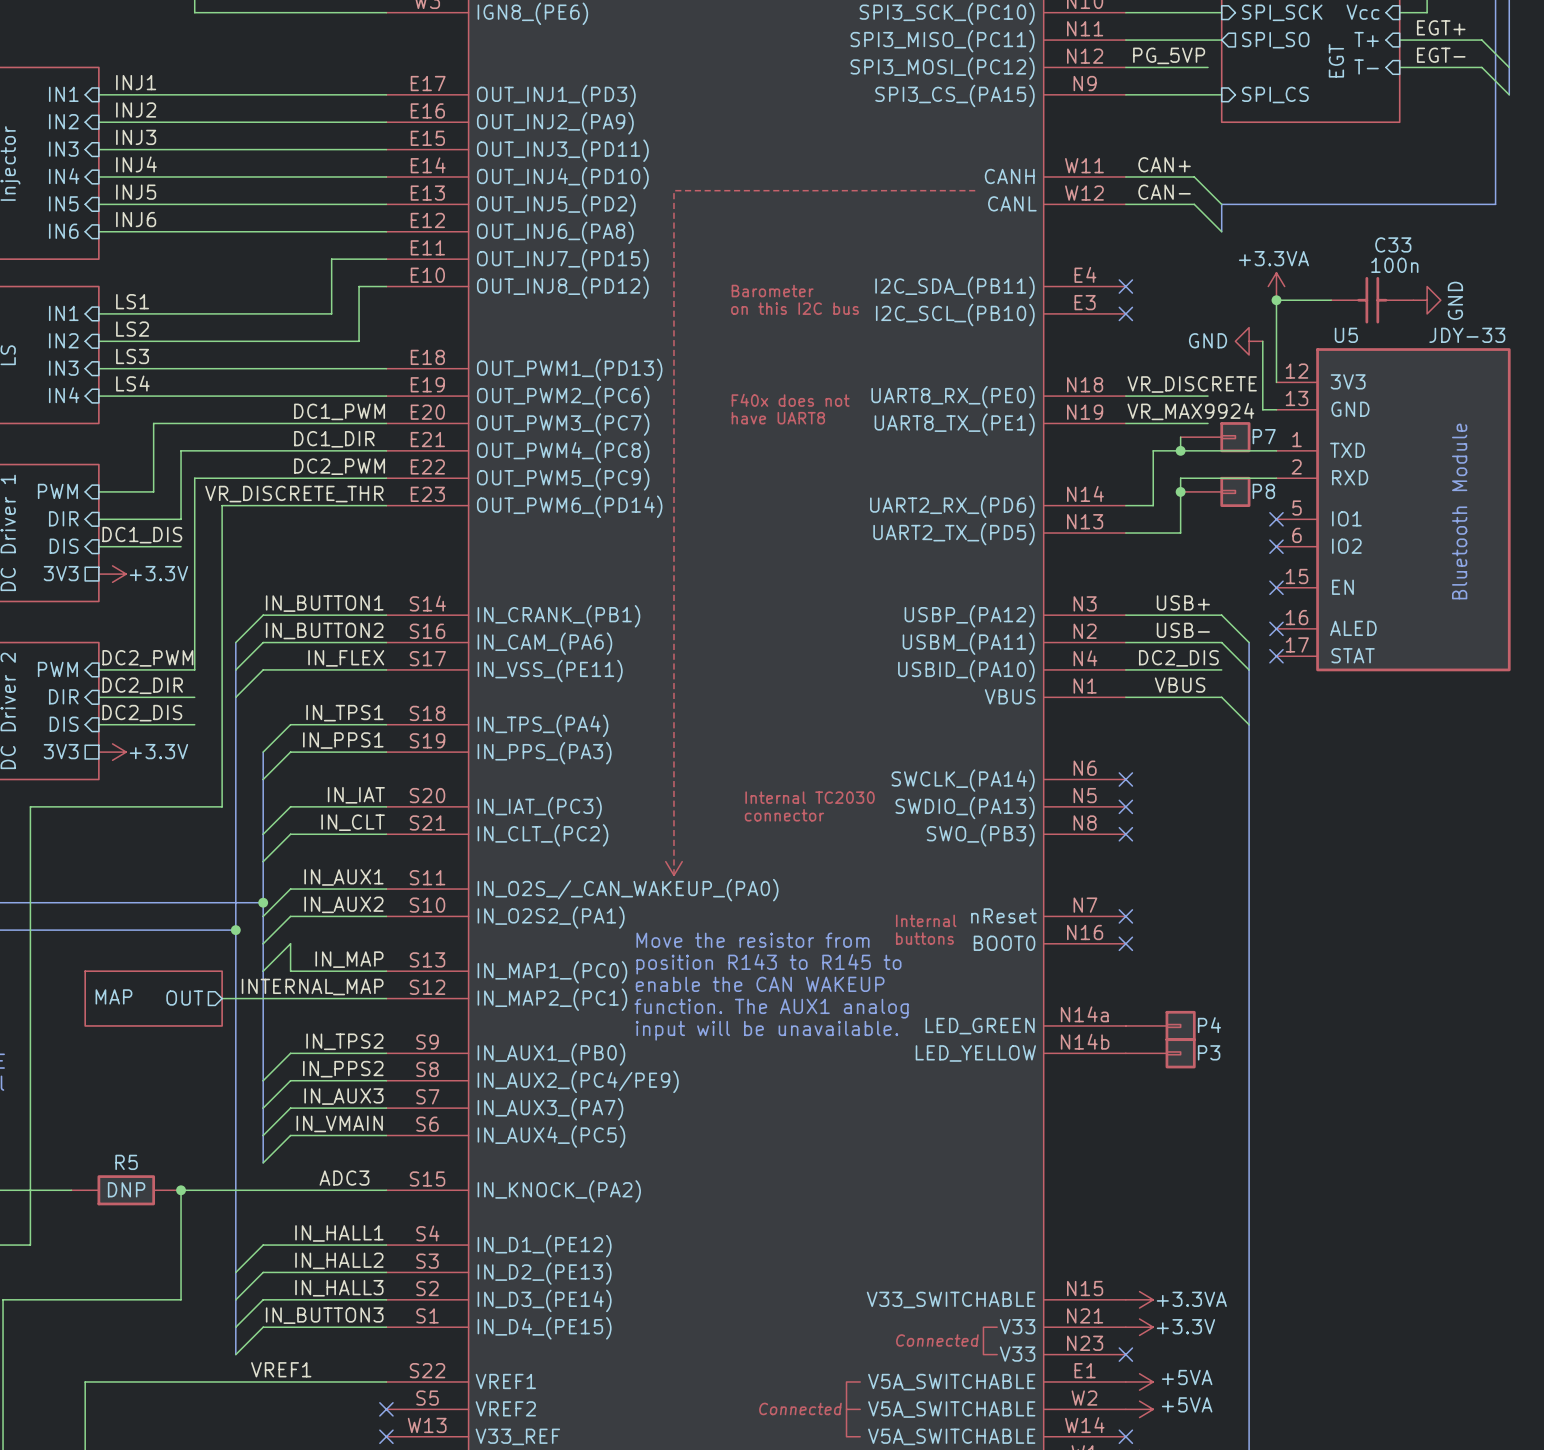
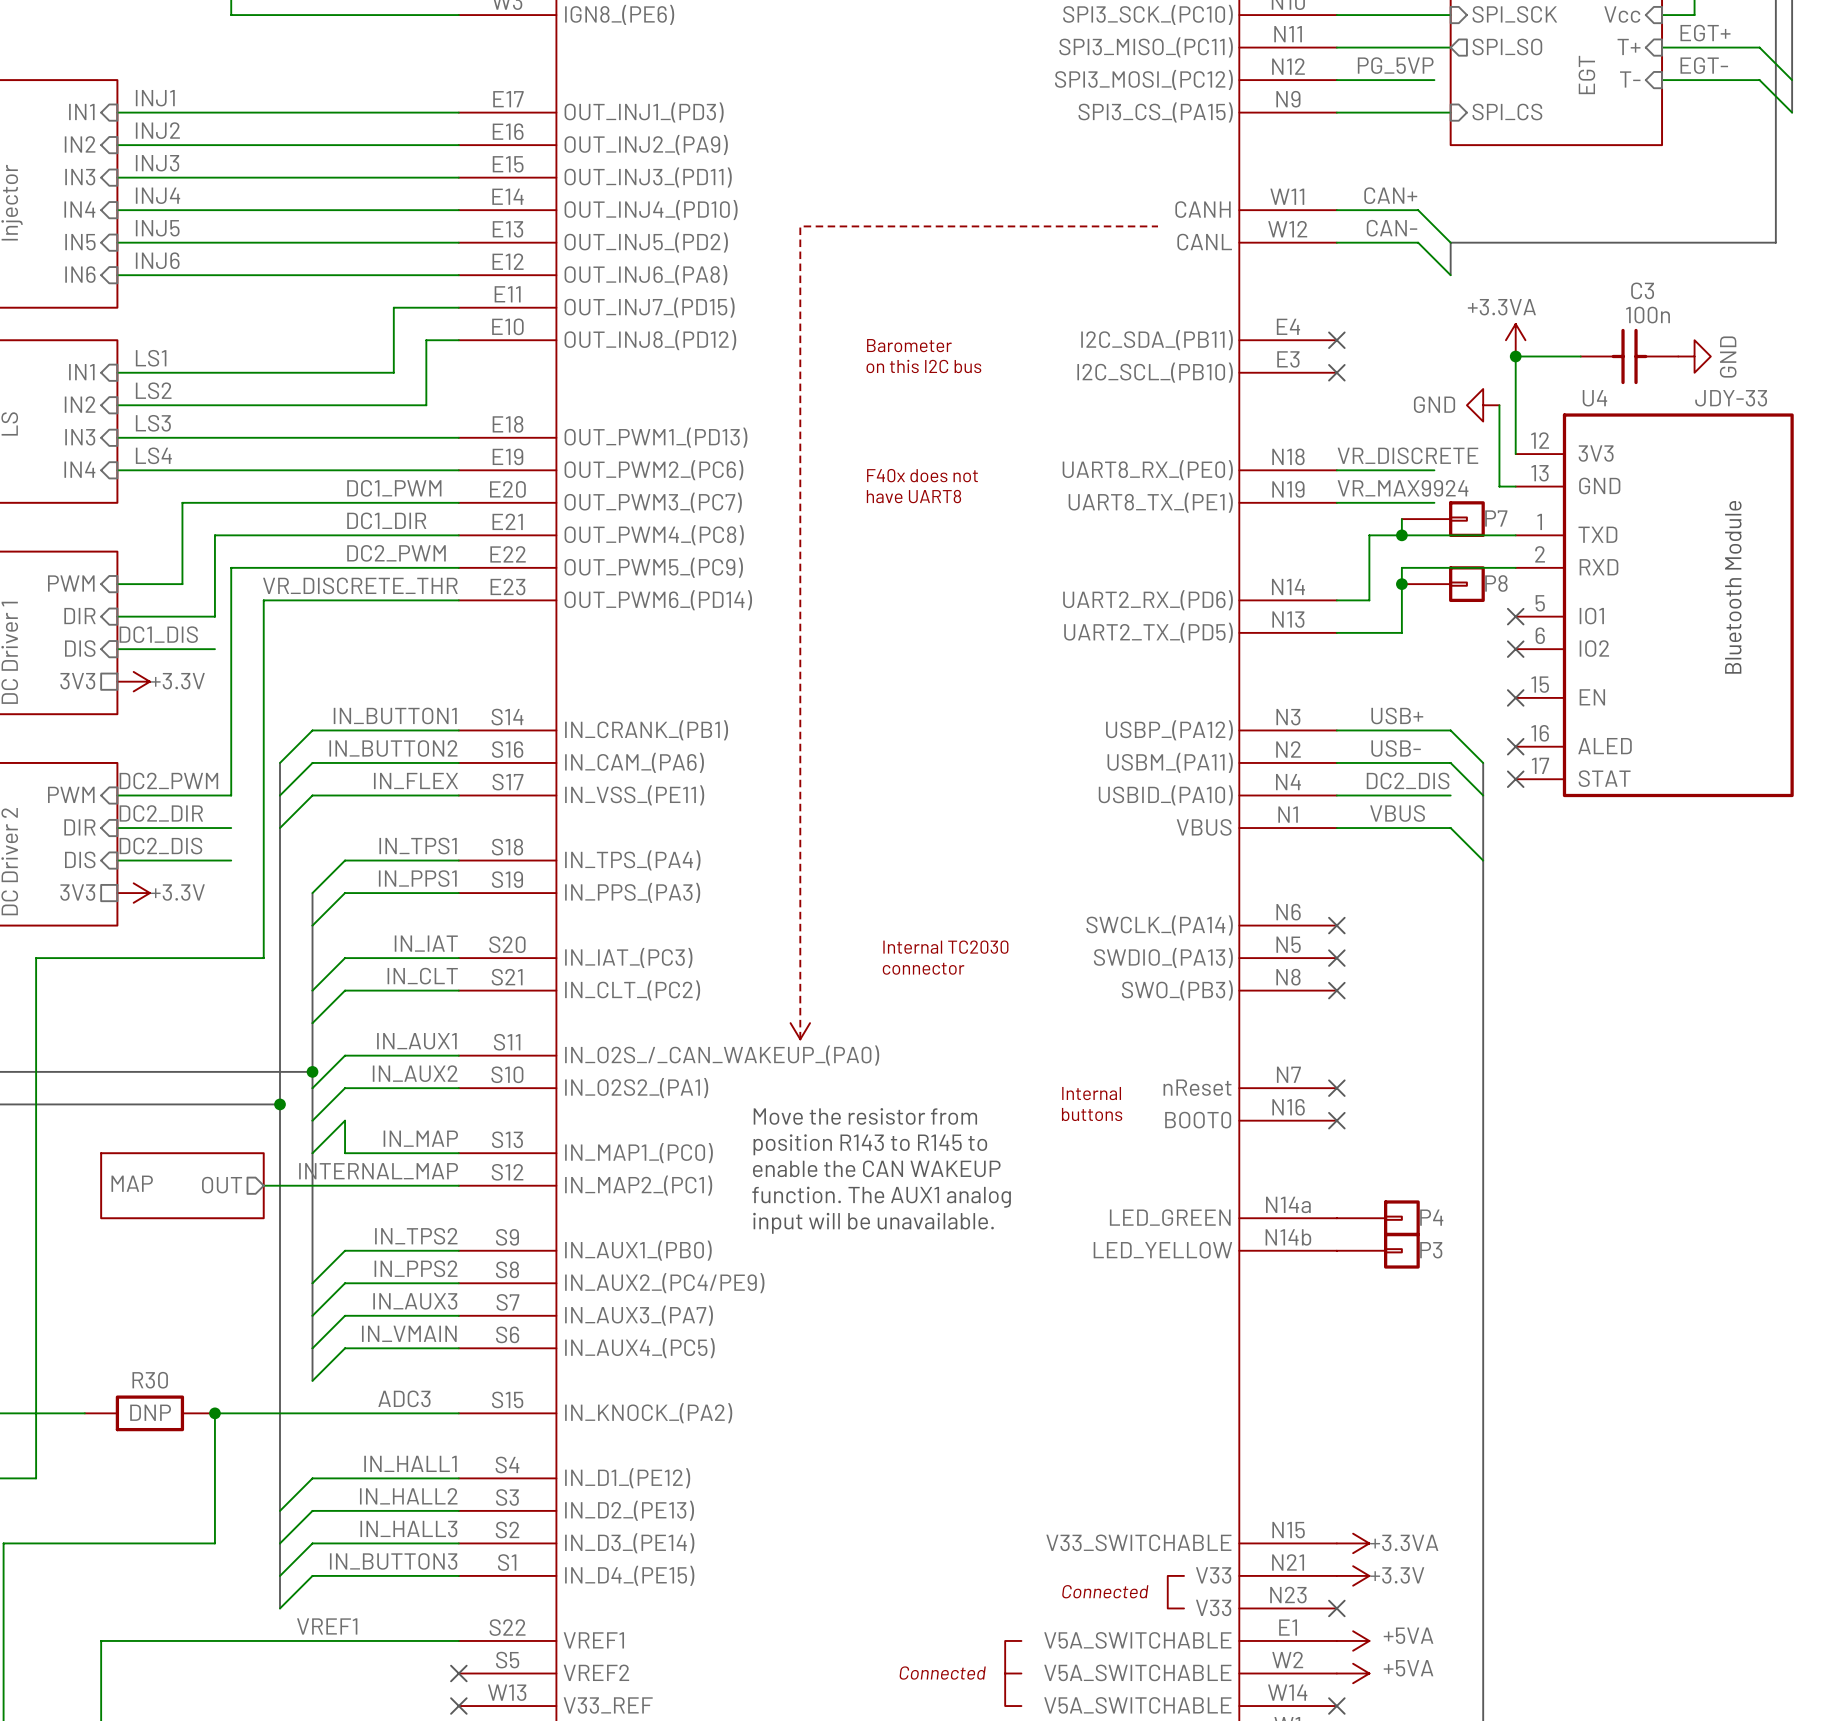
C33 name: C33 (1393, 244) -> C3 (1642, 290)
U5 name: U5 (1346, 335) -> U4 (1594, 398)
R5 name: R5 (126, 1162) -> R30 (150, 1380)

